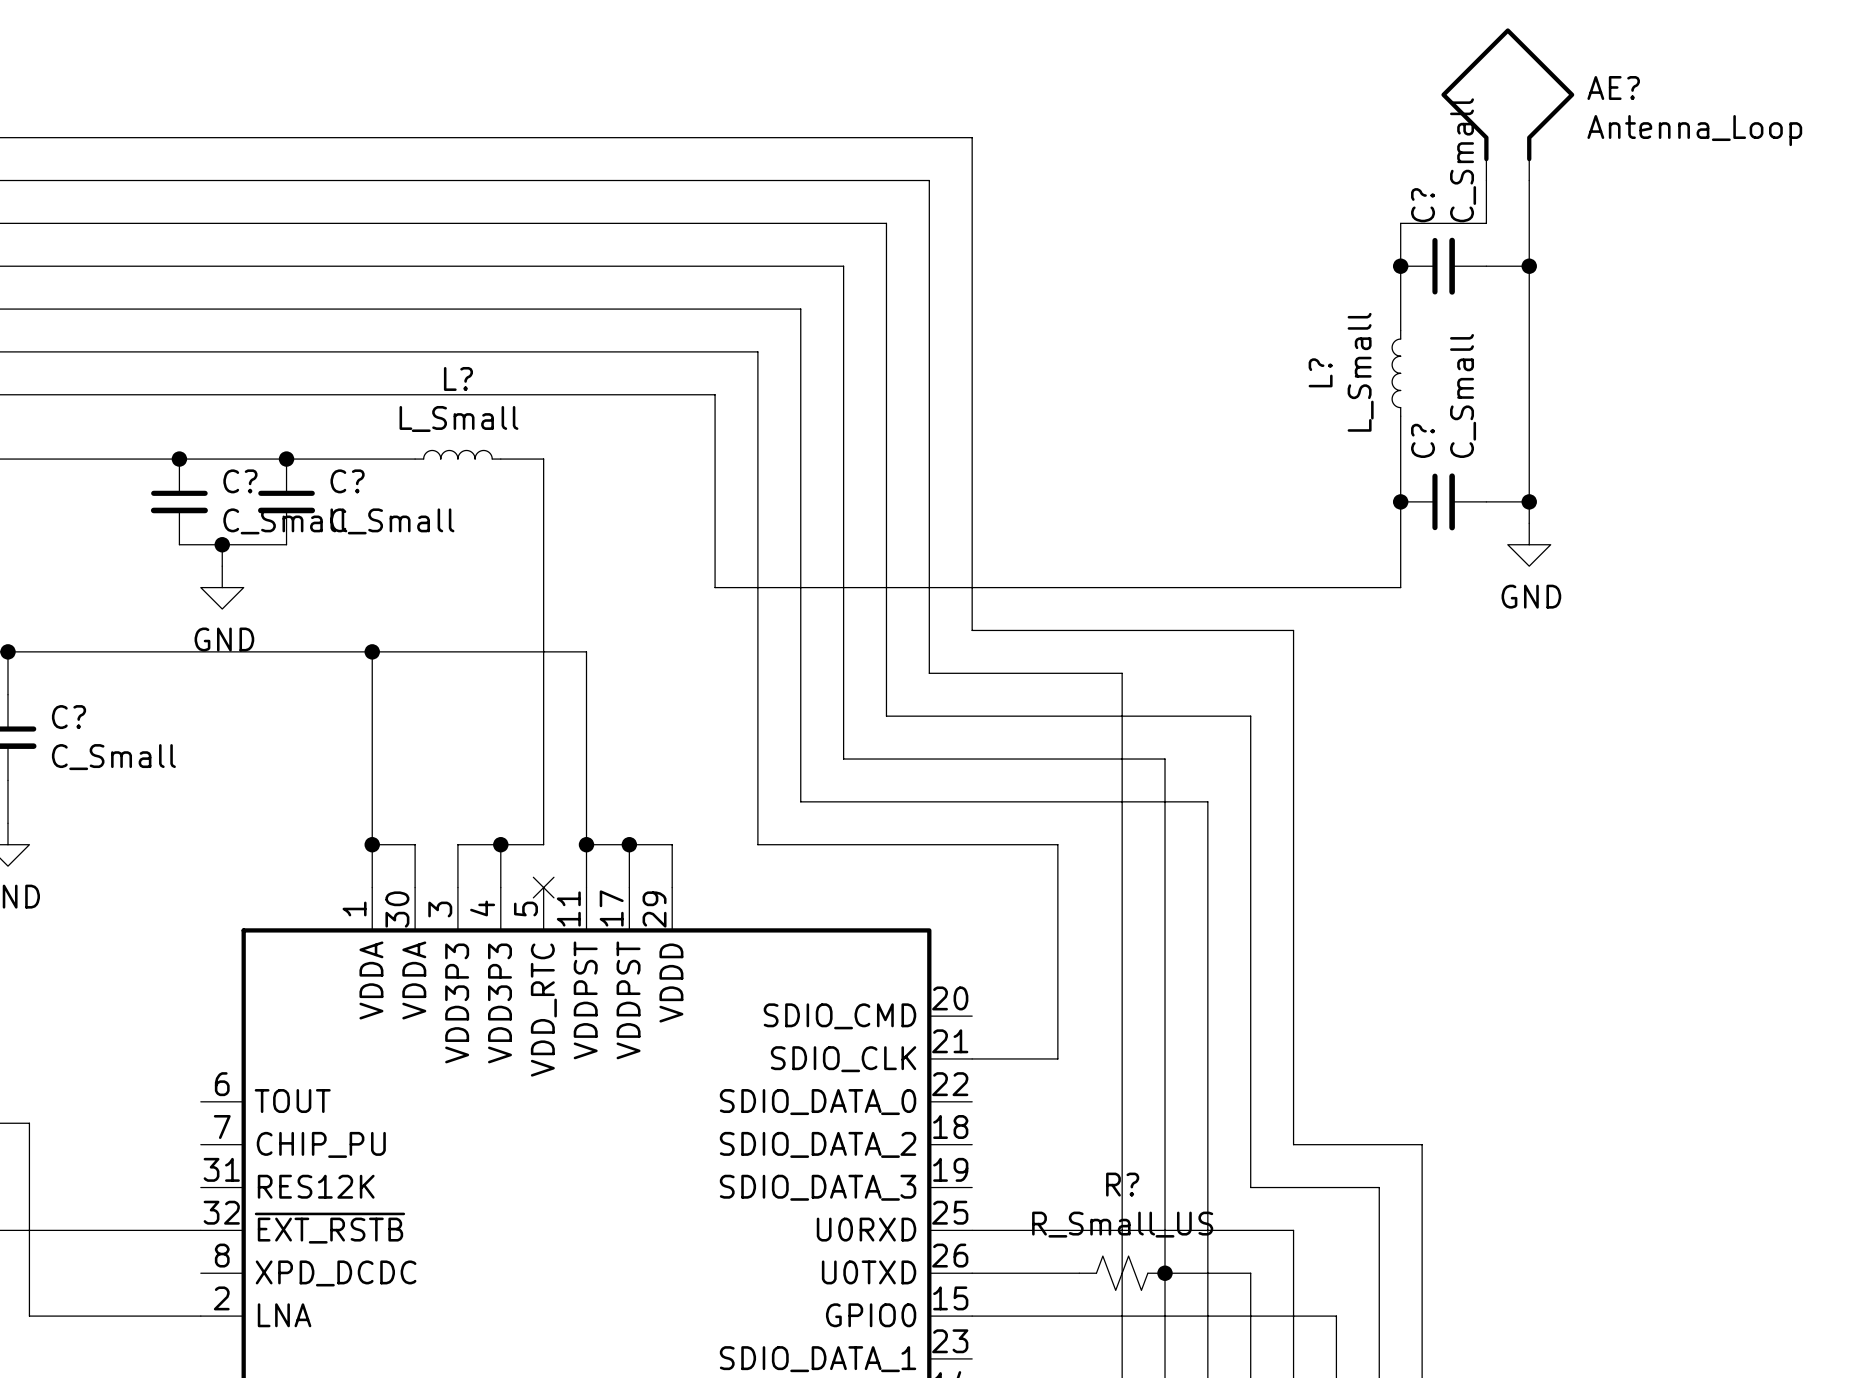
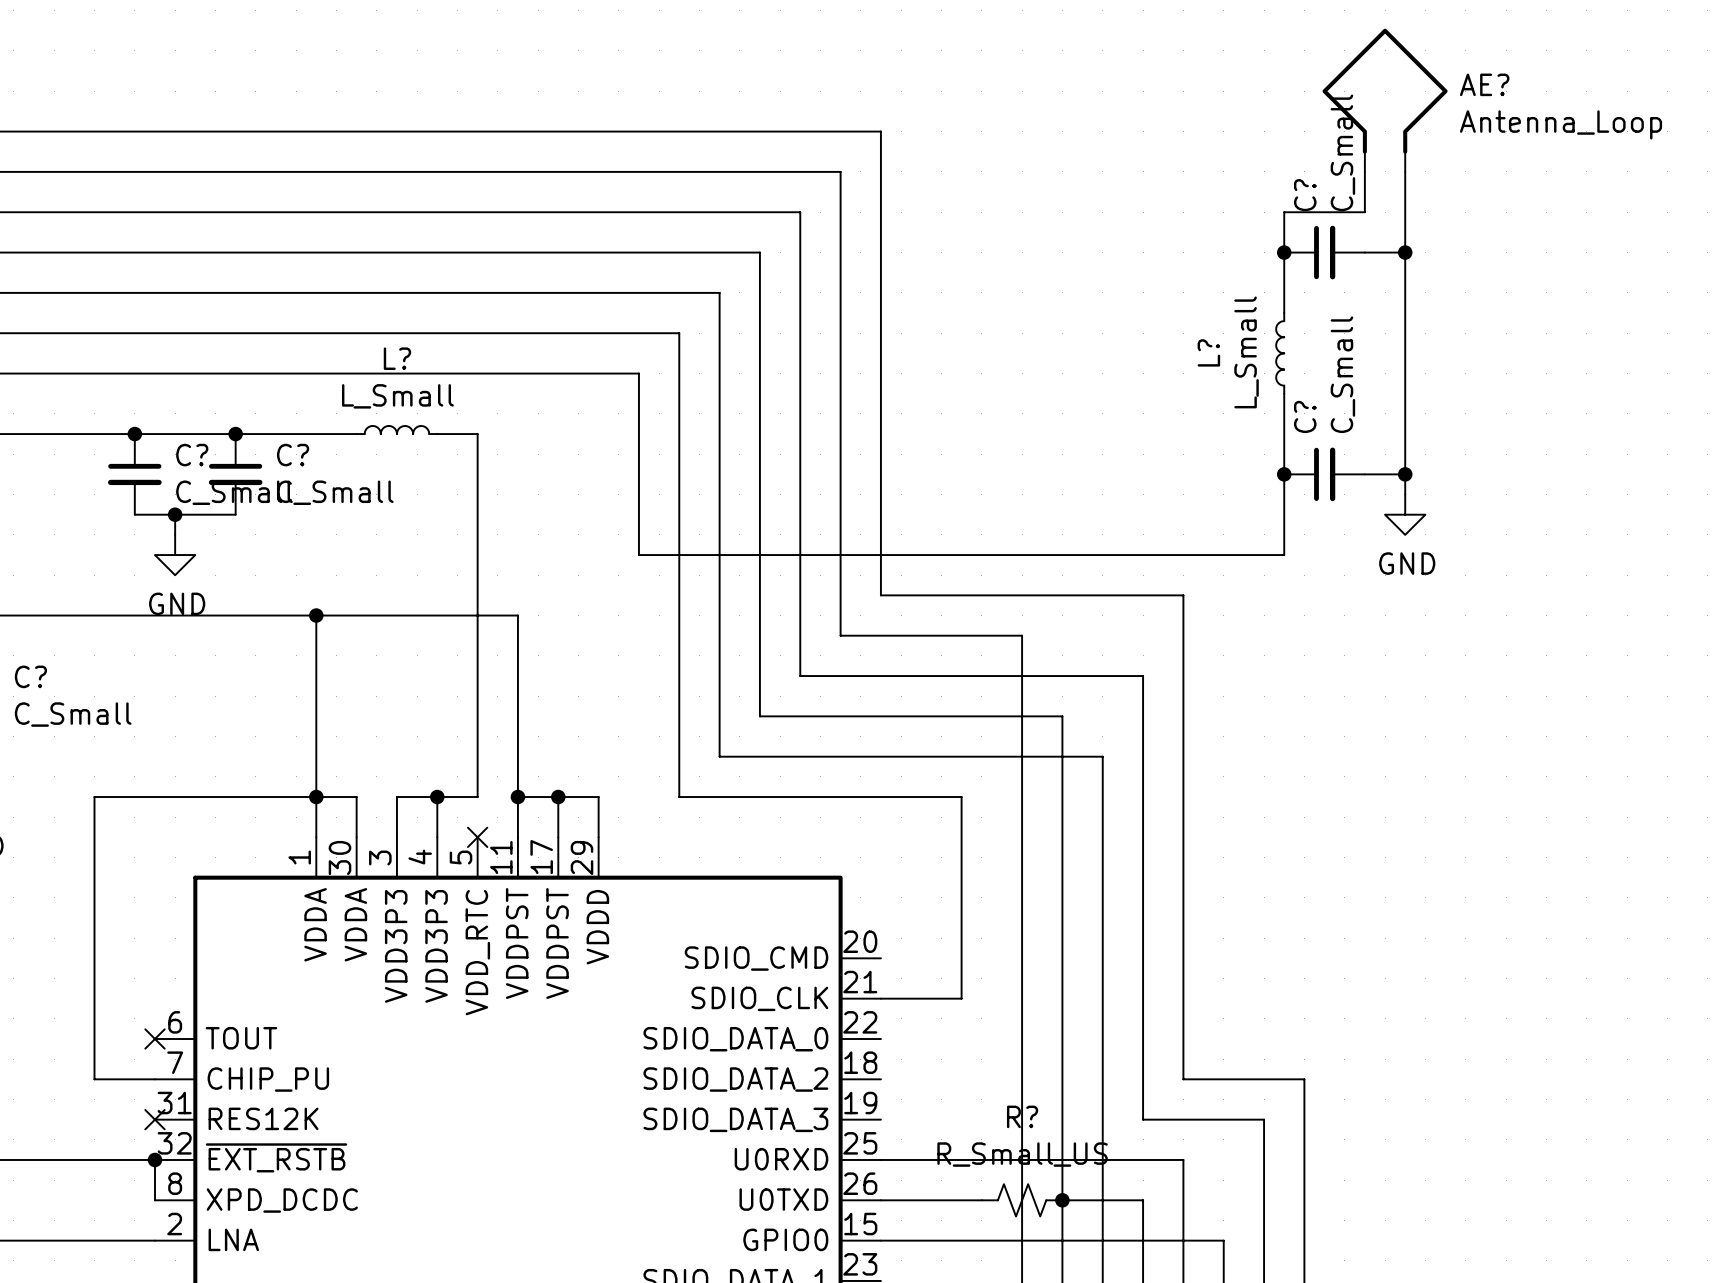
wire: none -> (316, 797) (94, 797) (94, 1079) (154, 1079)
no-connect mark: none -> (154, 1039)
no-connect mark: none -> (154, 1119)
wire: none -> (154, 1159) (154, 1200)
junction: none -> (154, 1159)

